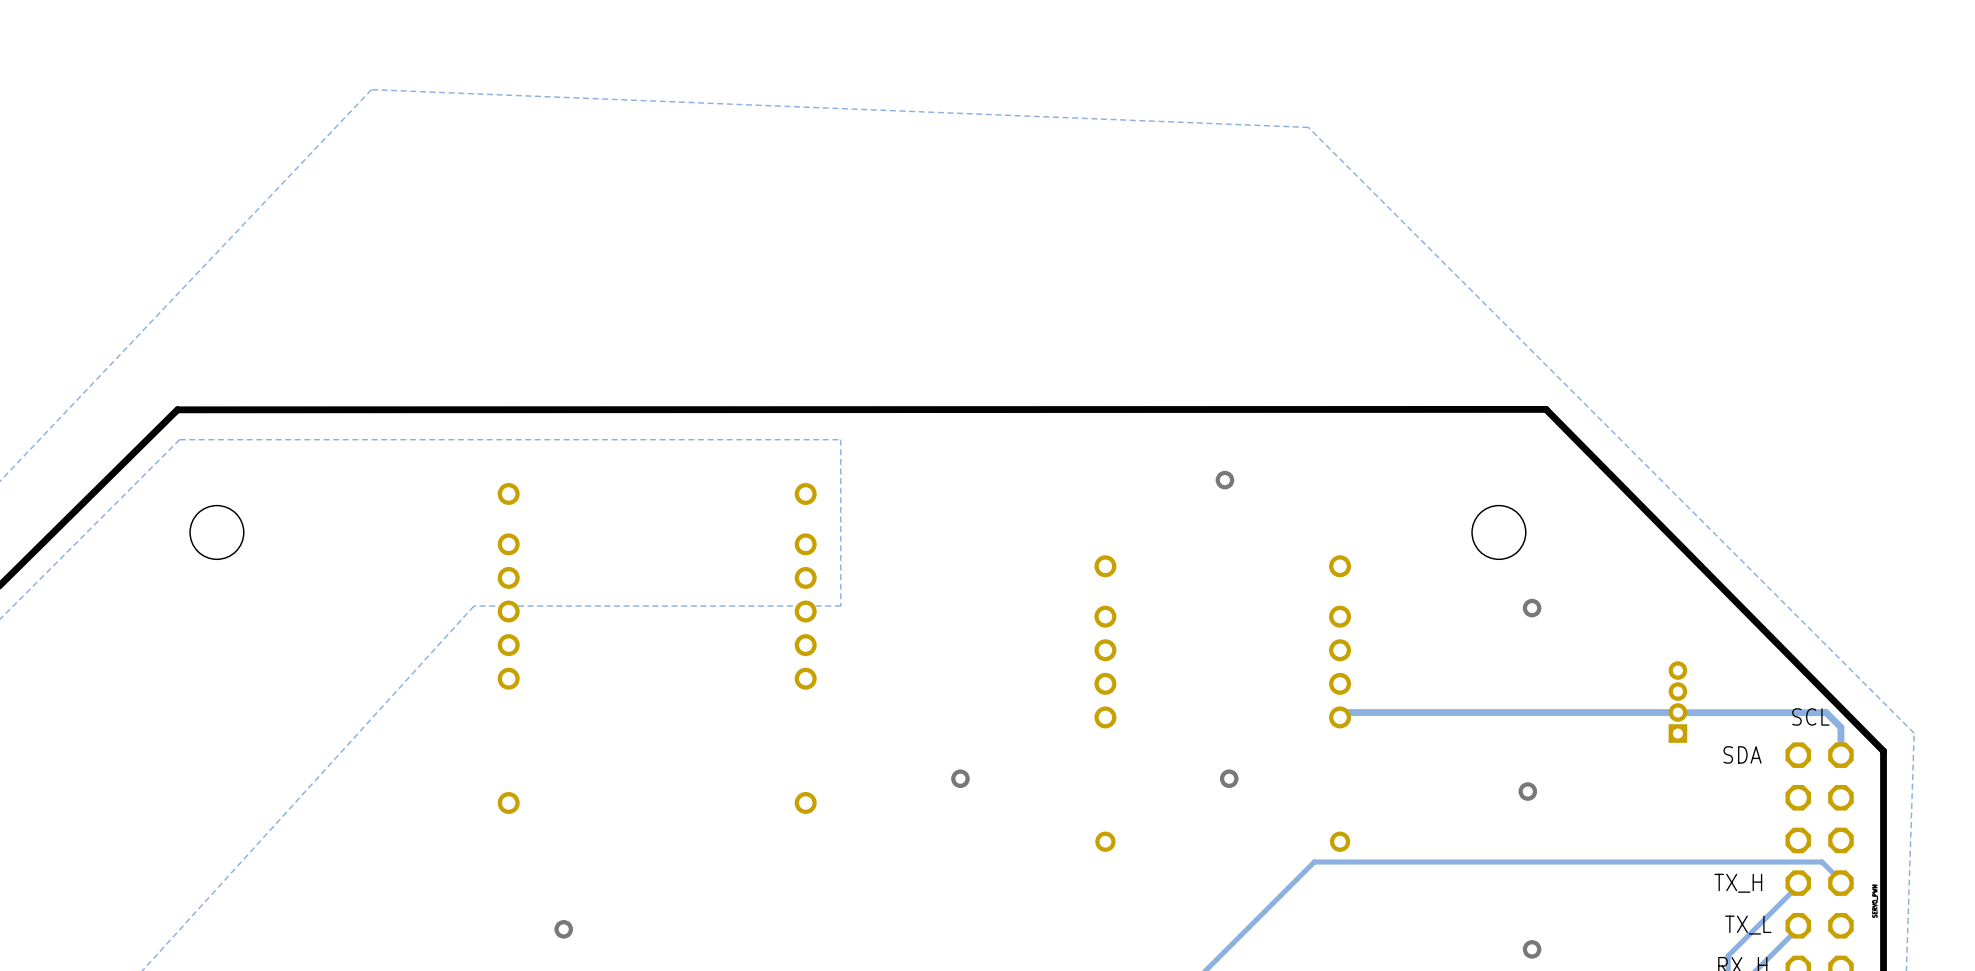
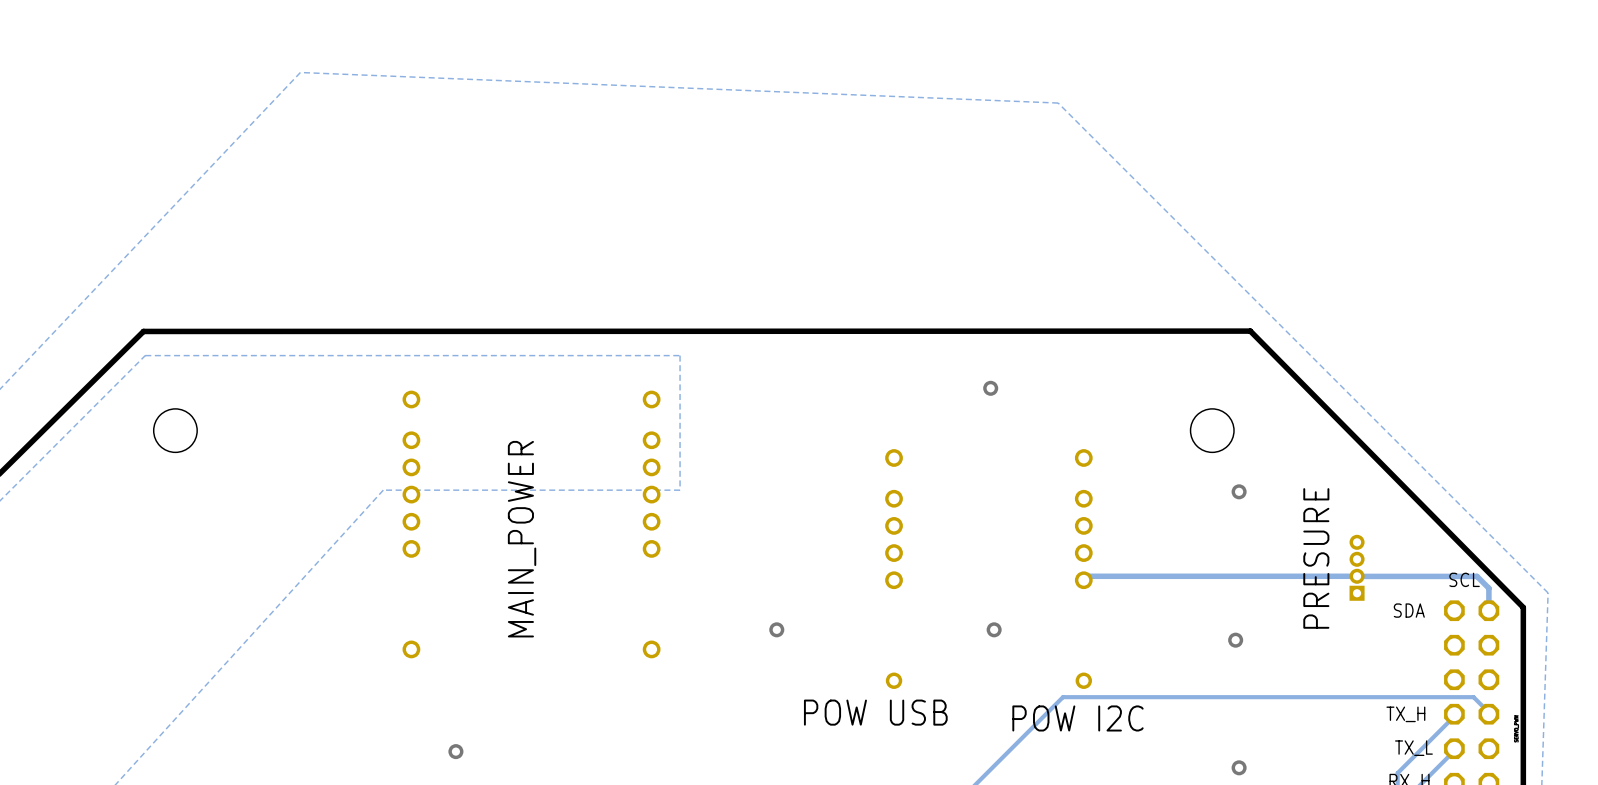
text: none -> MAIN_POWER (522, 539)
text: none -> PRESURE (1316, 558)
text: none -> POW USB (875, 712)
text: none -> POW I2C (1077, 718)

